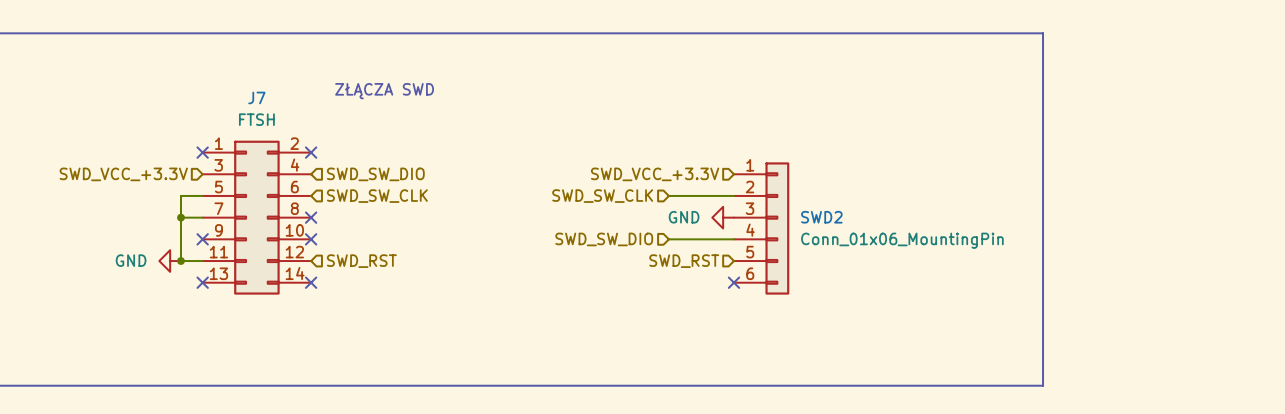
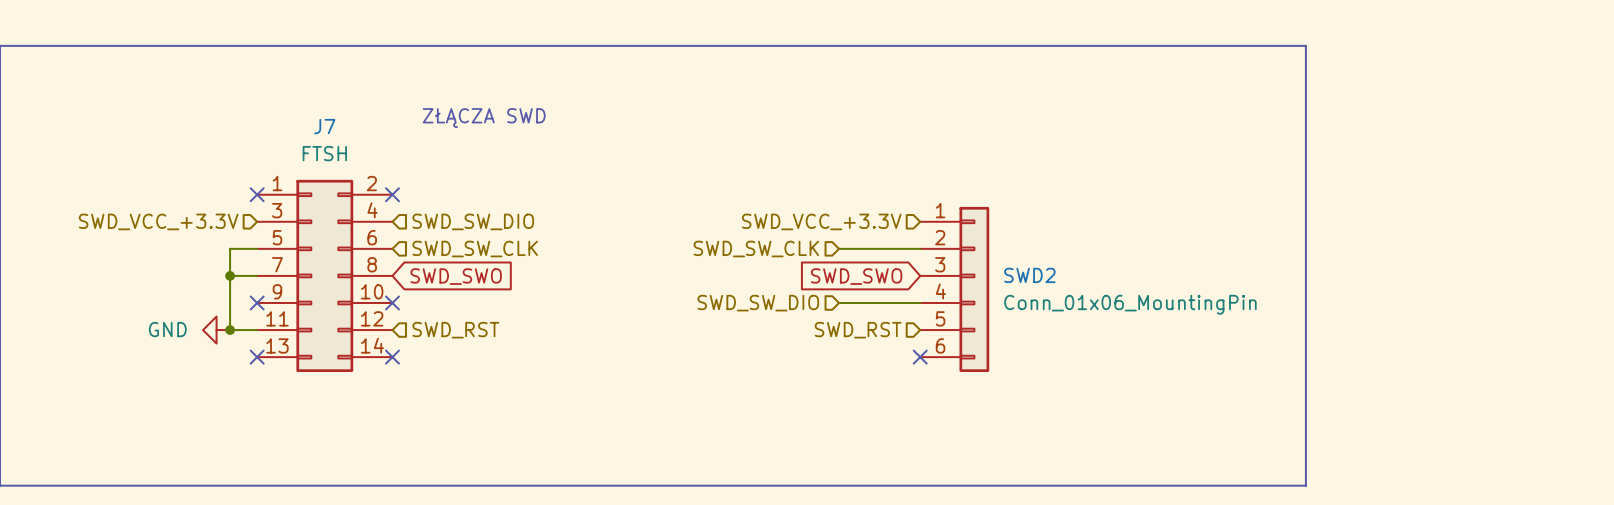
no-connect mark: (311, 217) -> none
power symbol: GND (723, 217) -> none
global label: none -> SWD_SWO (456, 276)
global label: none -> SWD_SWO (856, 276)

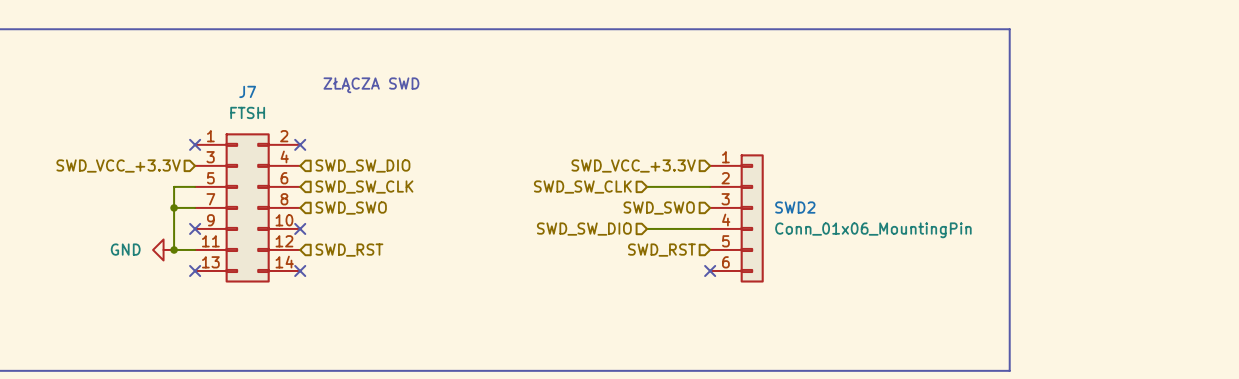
global label: SWD_SWO (456, 276) -> none
hierarchical label: none -> SWD_SWO (351, 208)
hierarchical label: none -> SWD_SWO (659, 208)
global label: SWD_SWO (856, 276) -> none

